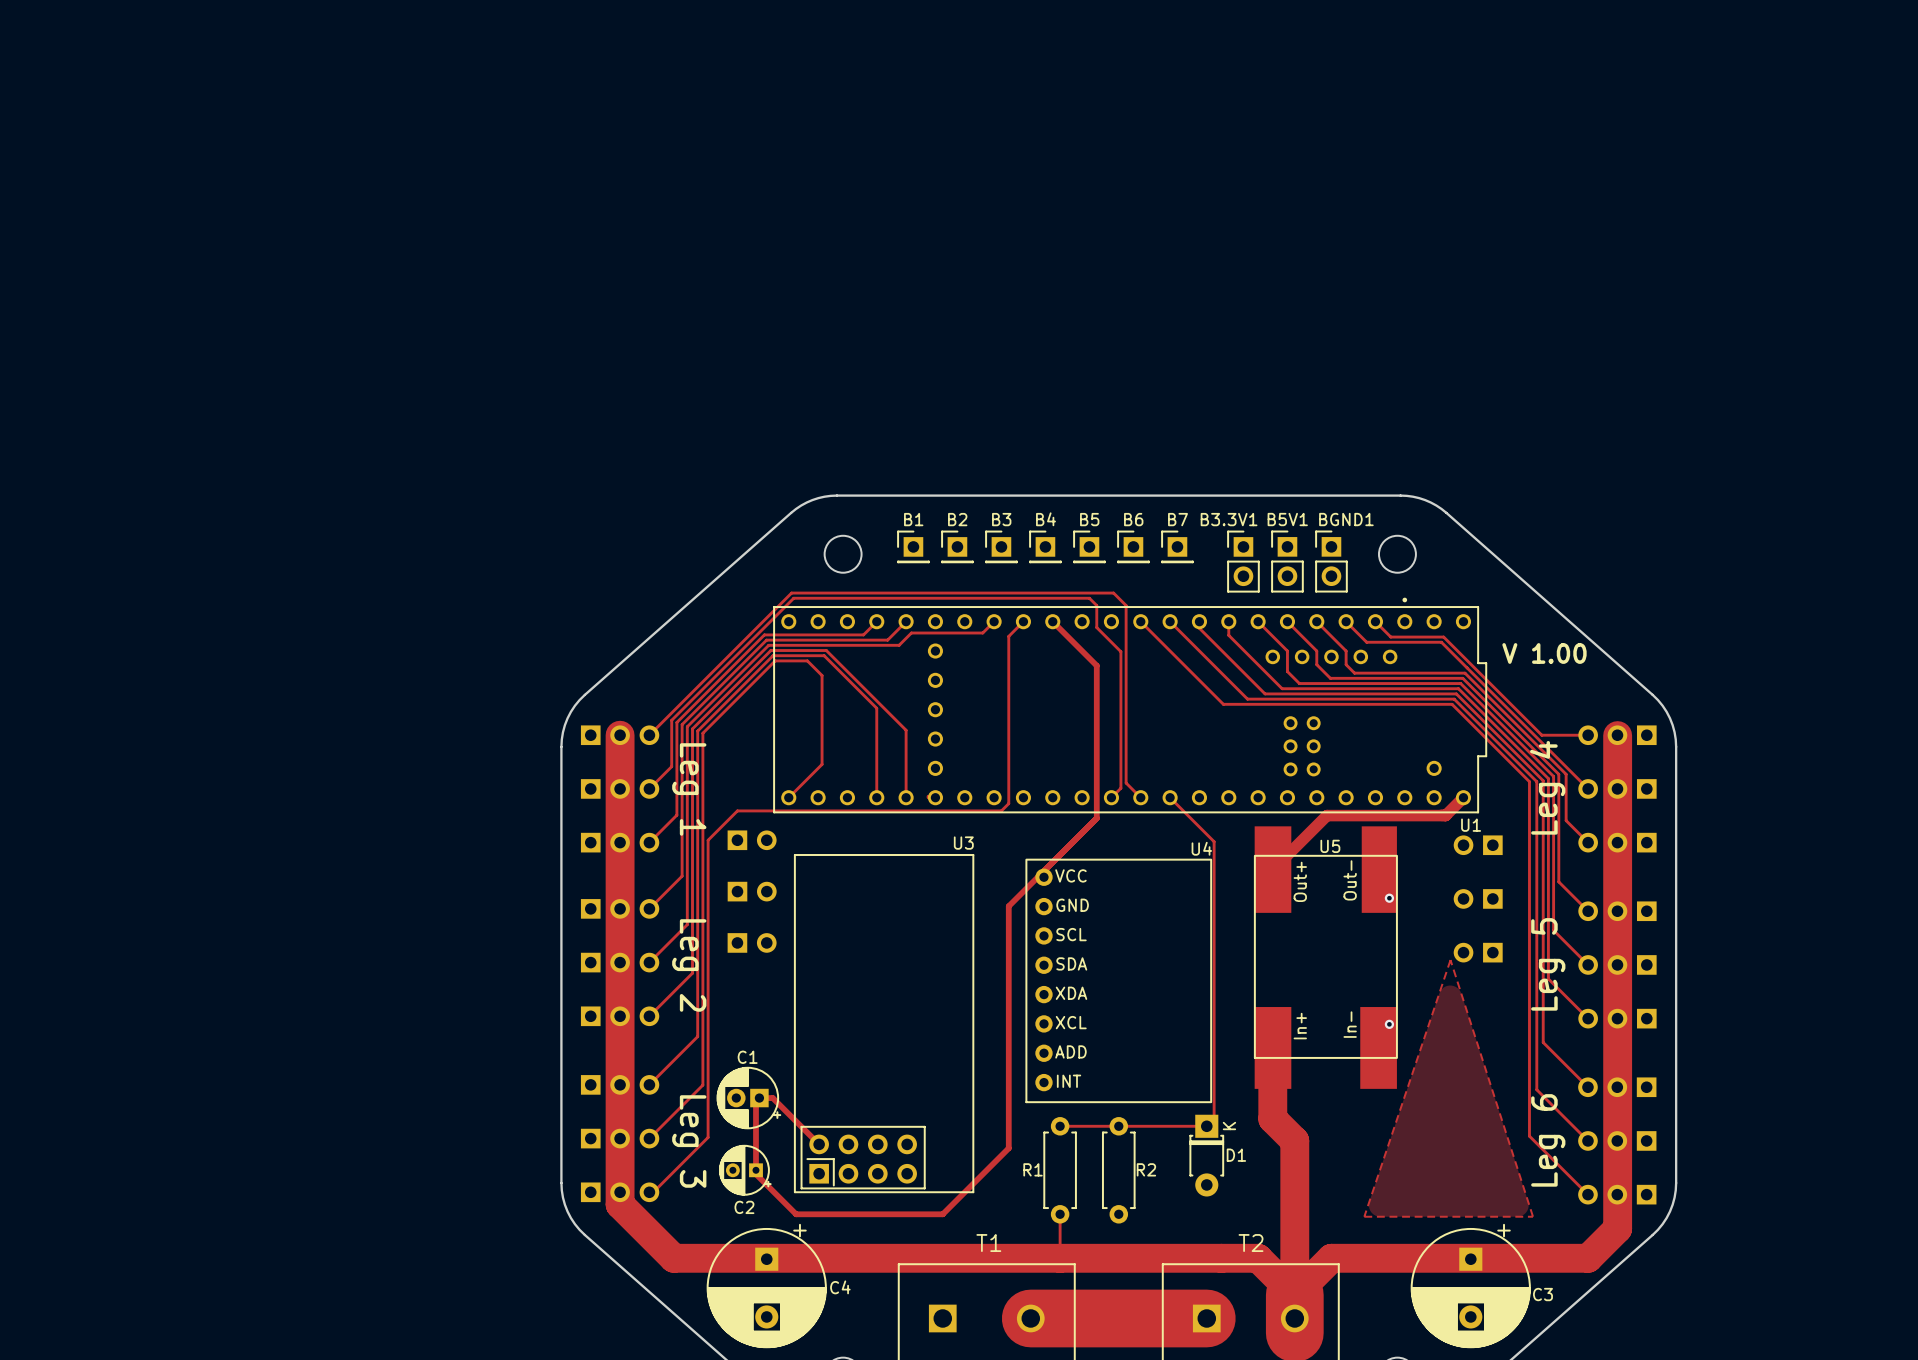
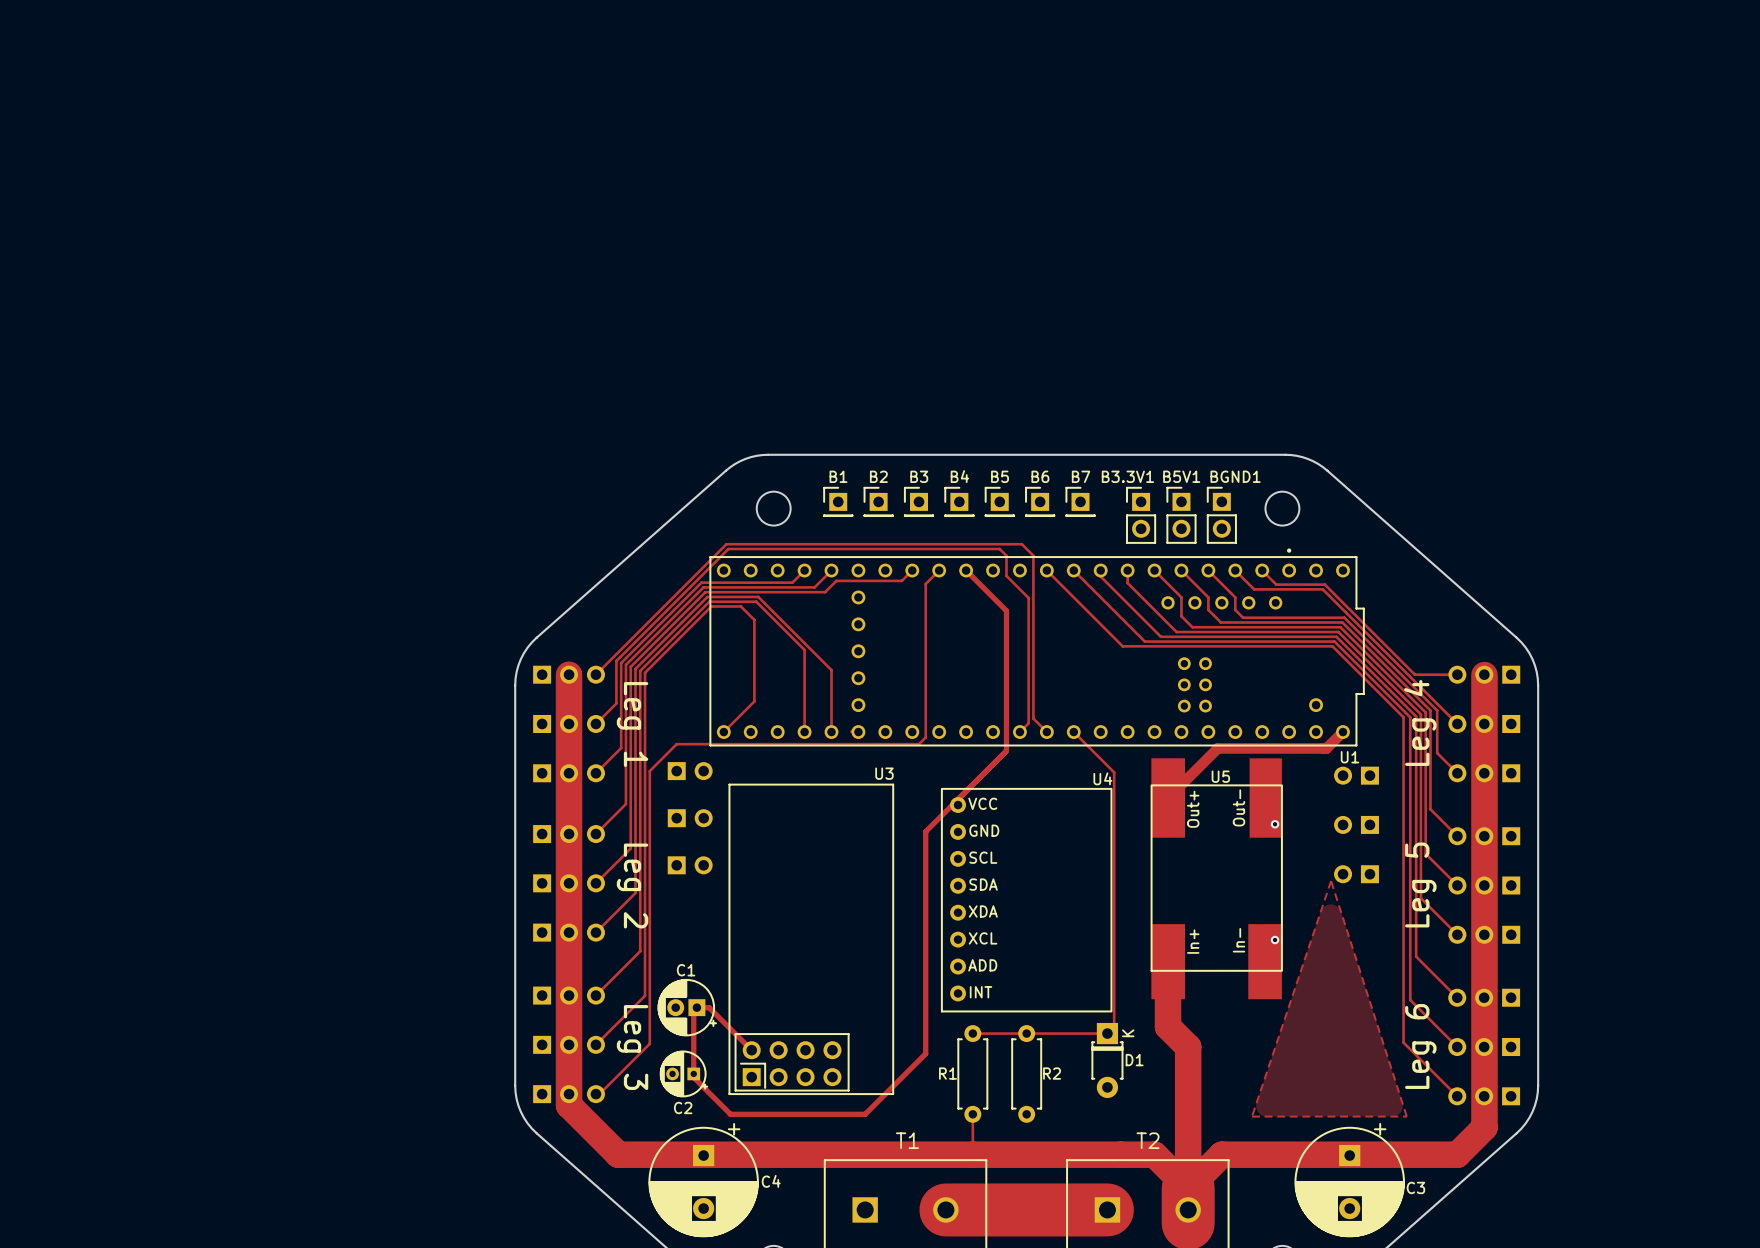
text: V 1.00 (1544, 653) -> none

